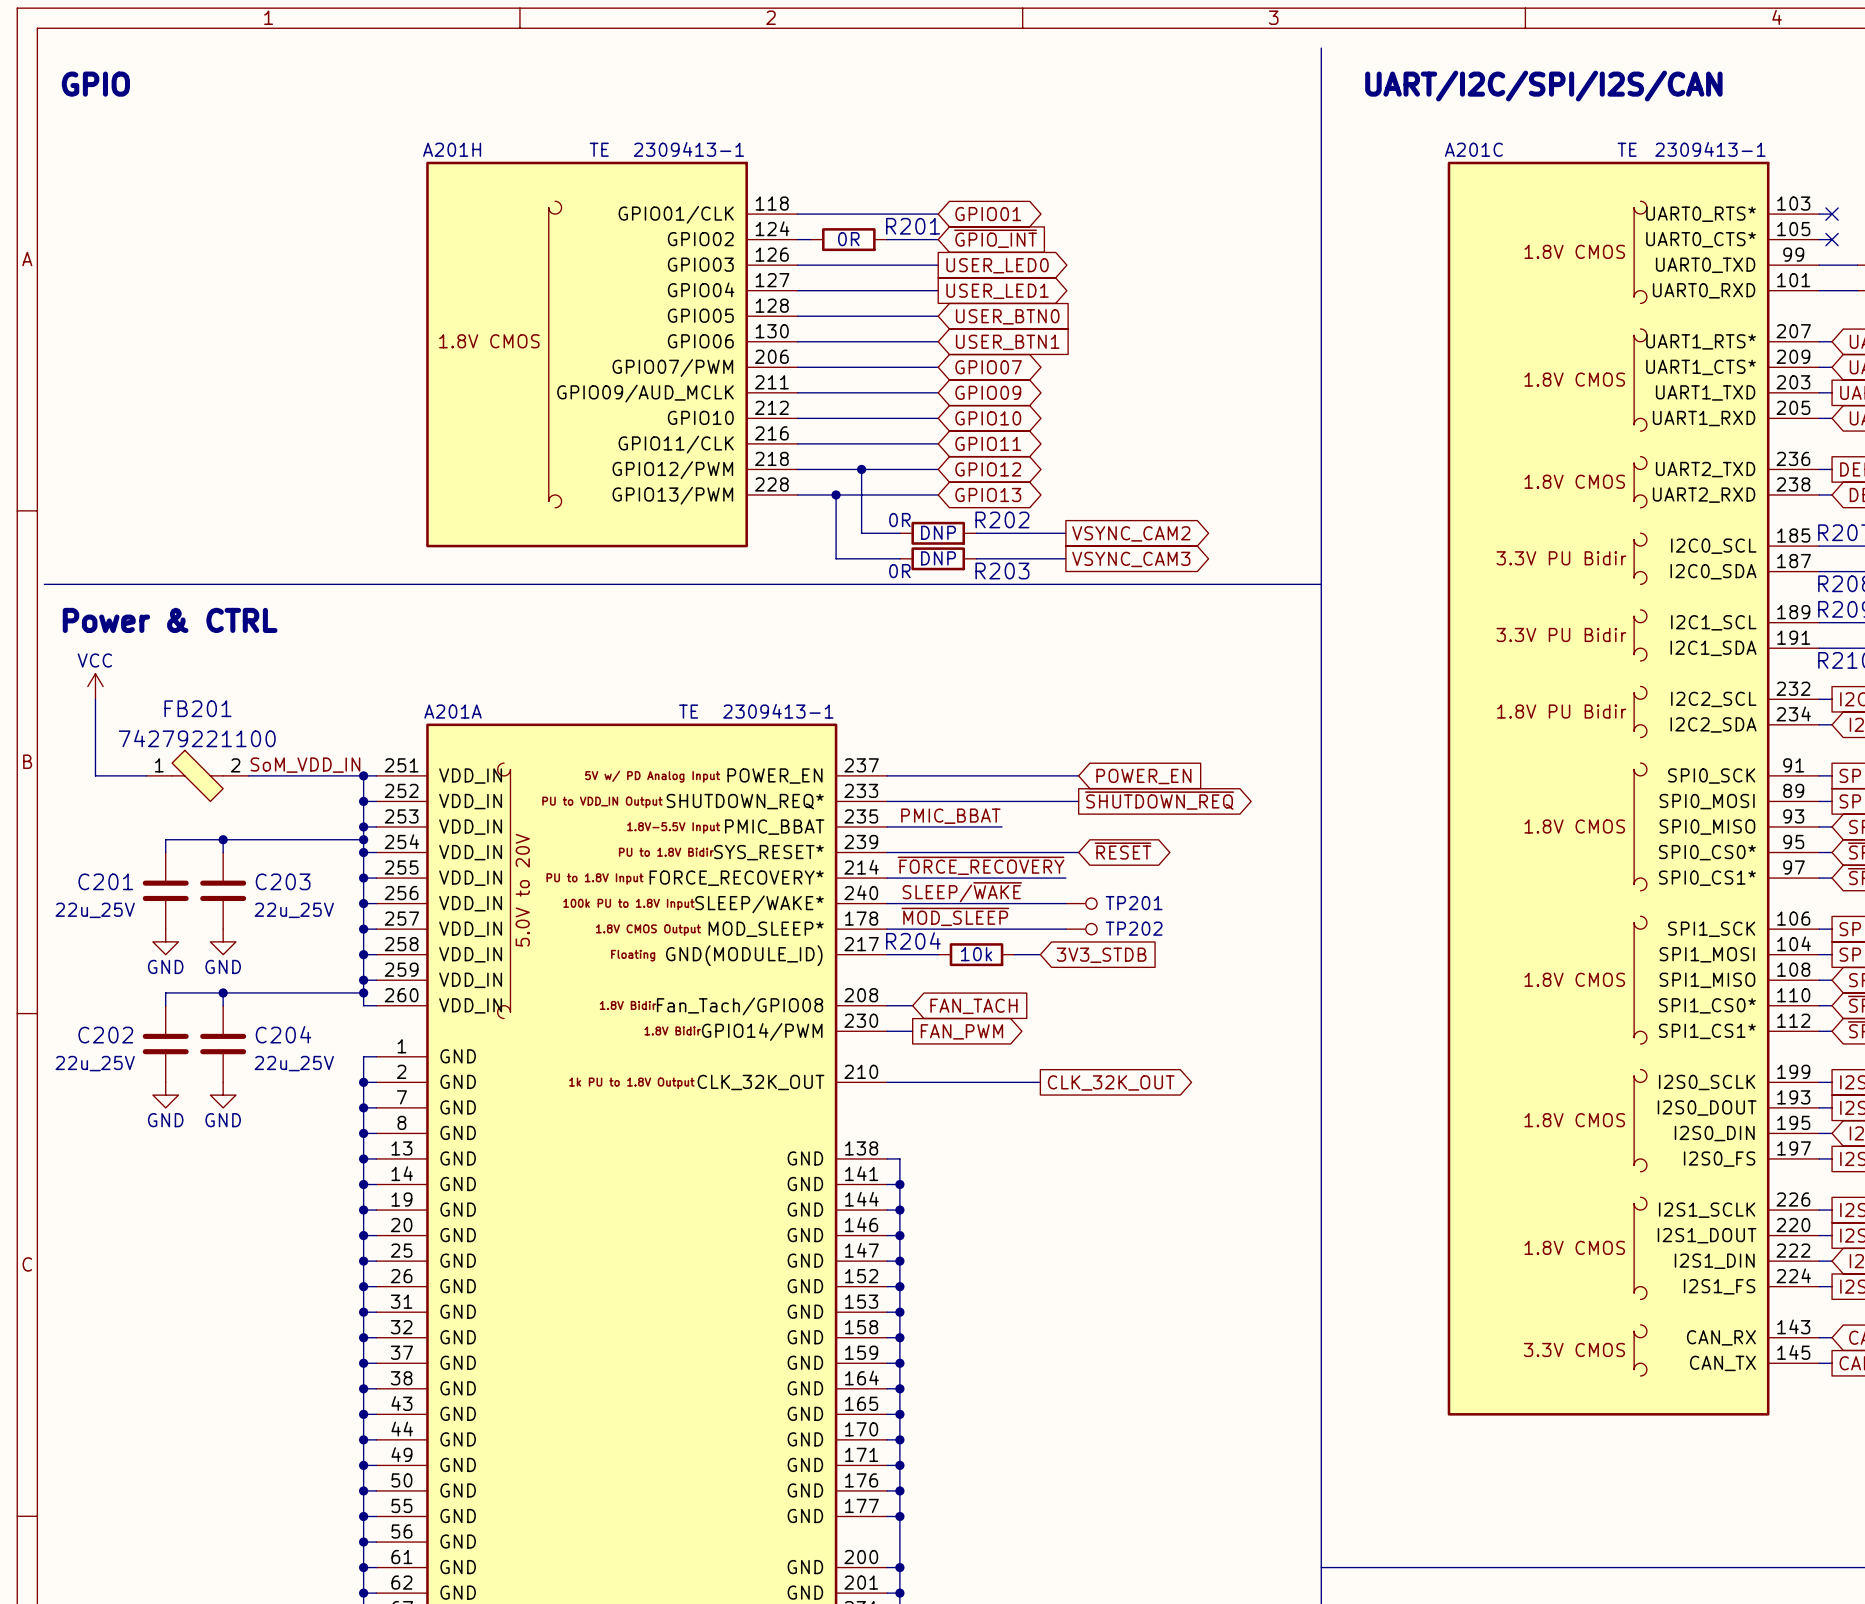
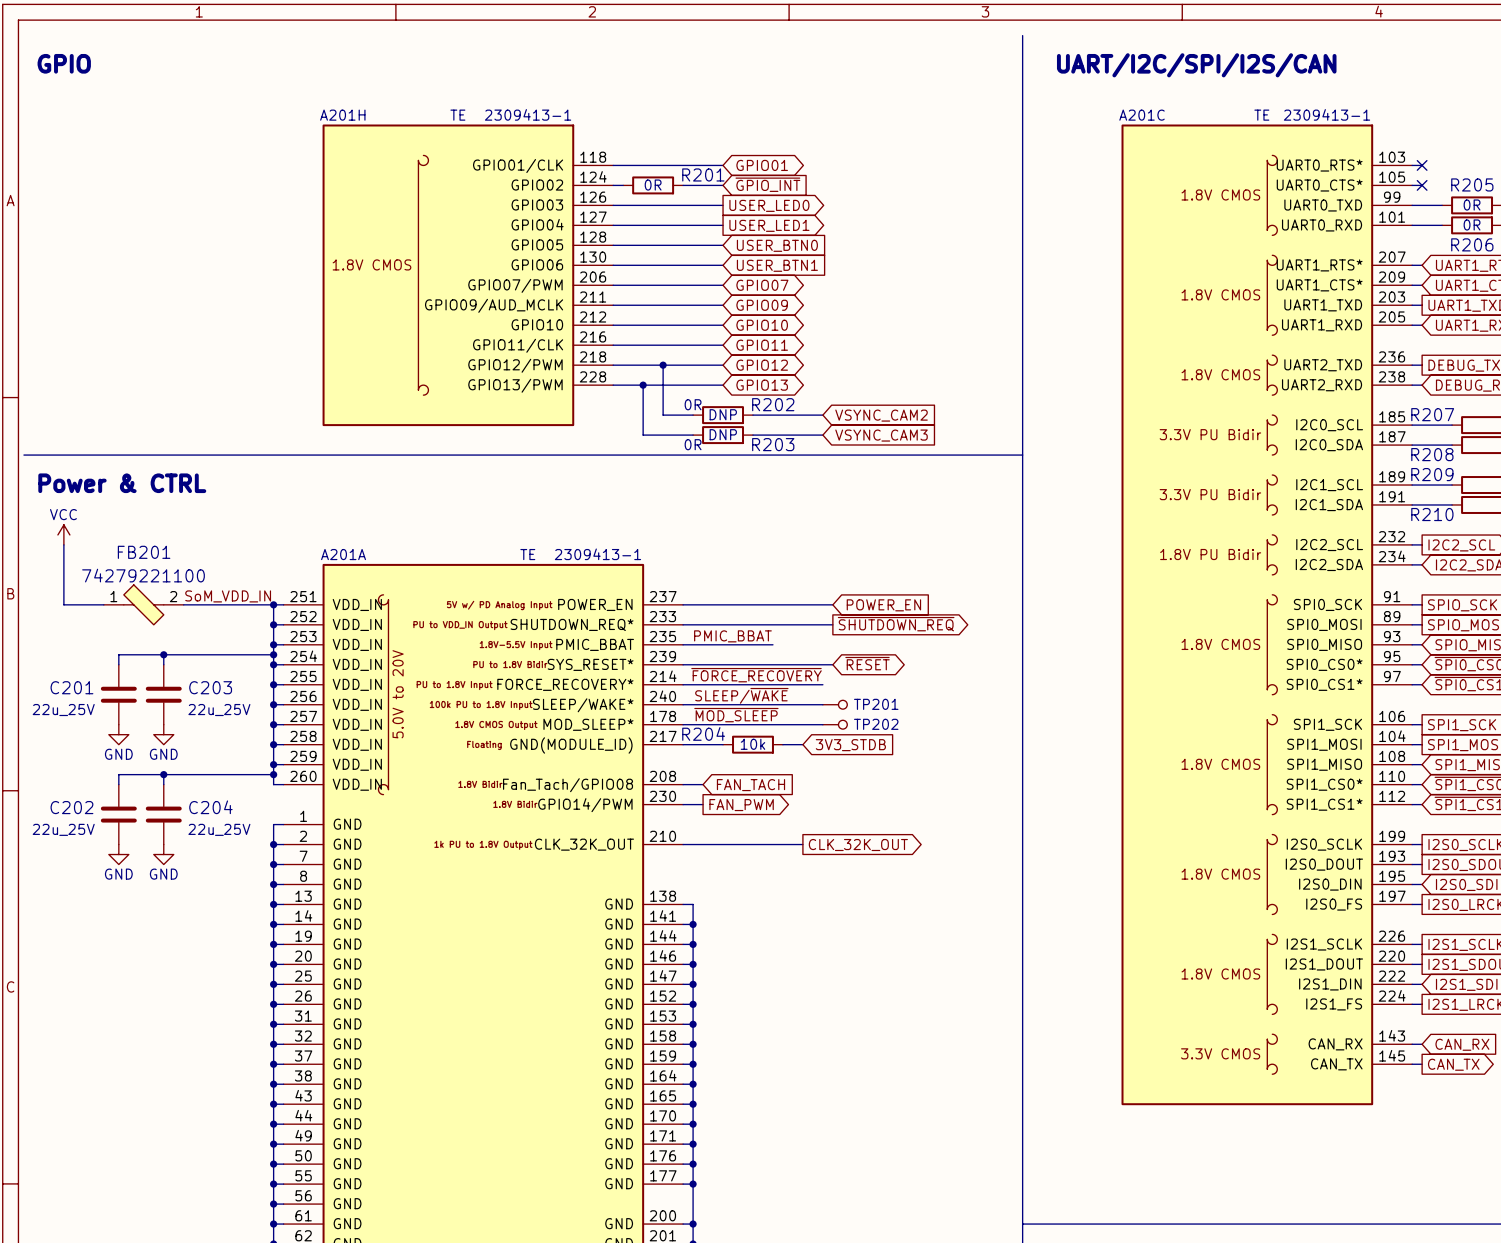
global label shape: output (1131, 533) -> input (881, 415)
global label shape: output (1131, 559) -> input (881, 435)

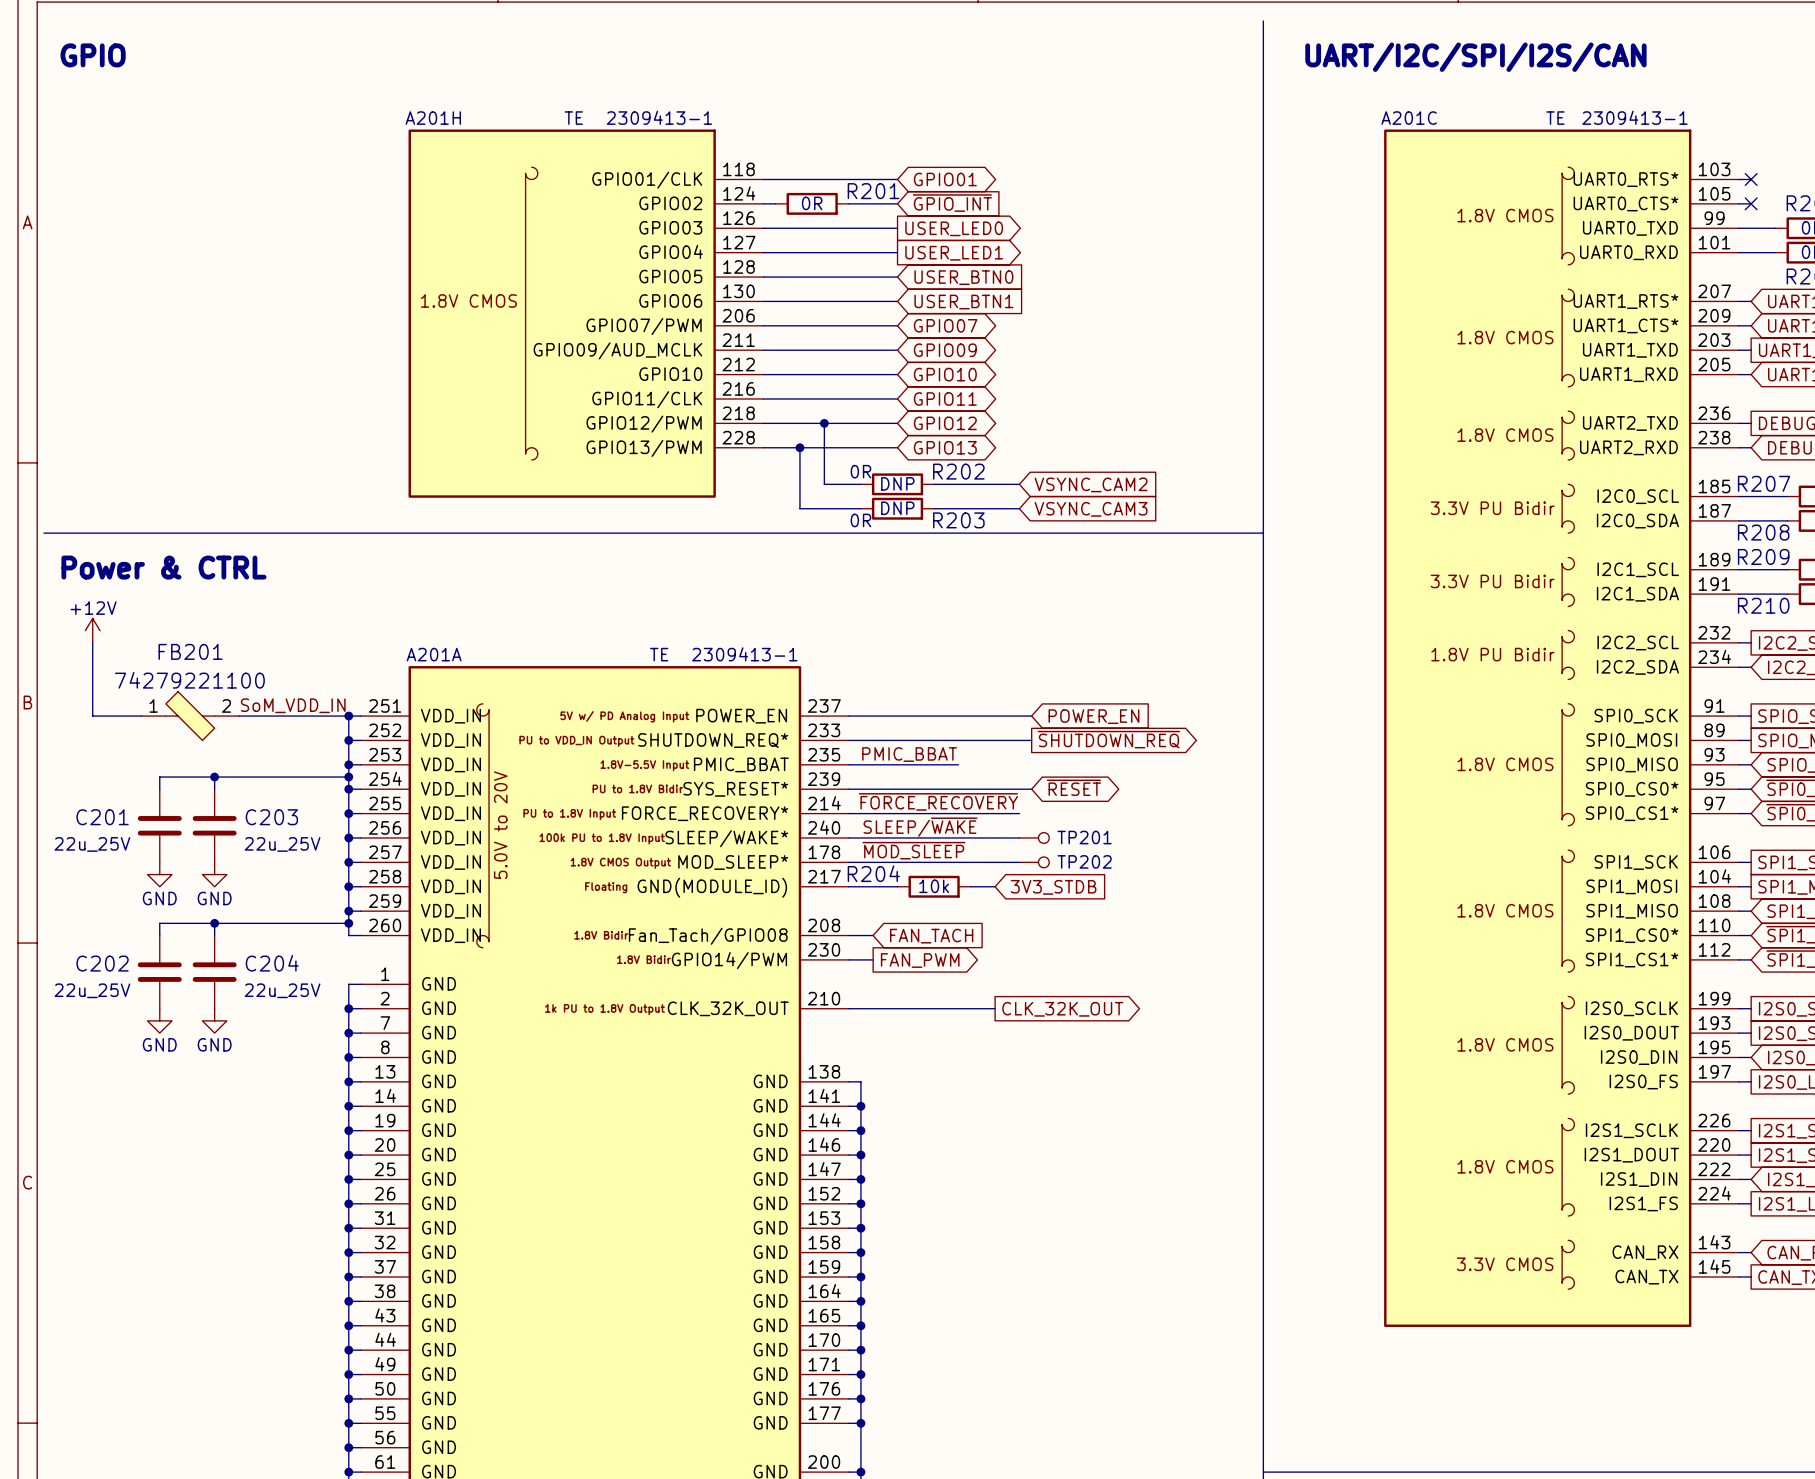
power symbol: VCC (63, 534) -> +12V (92, 630)

